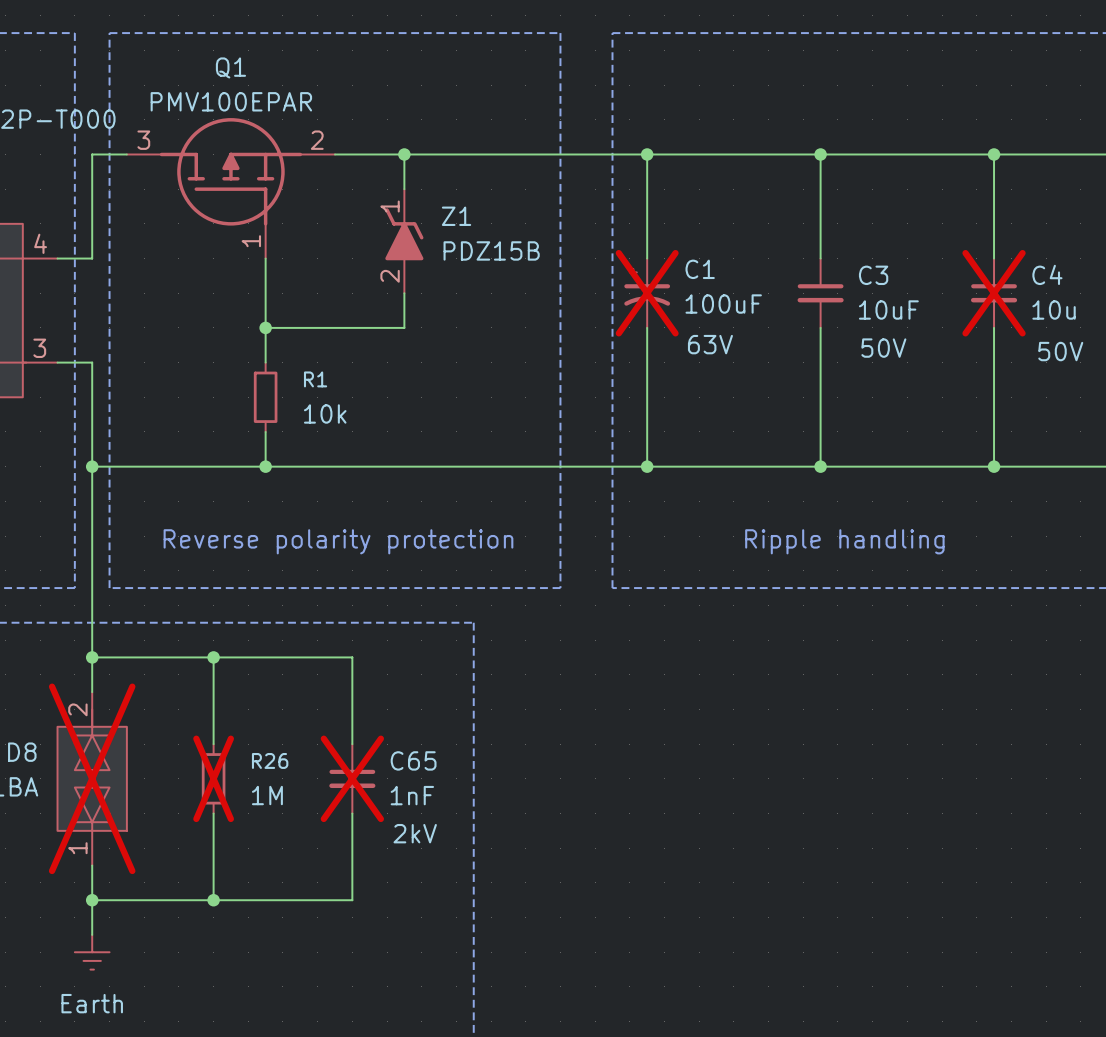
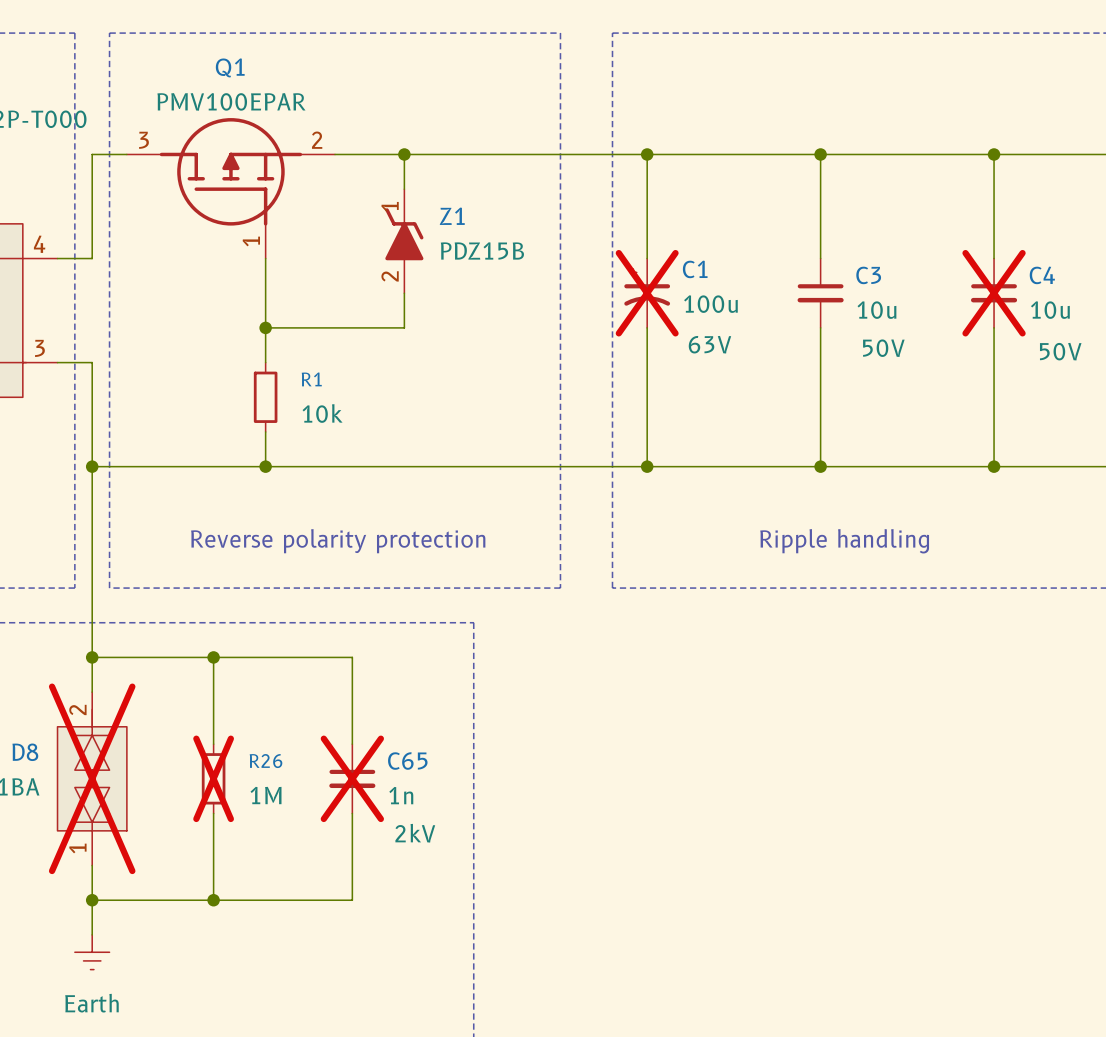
C1 value: 100uF (723, 304) -> 100u (710, 304)
C3 value: 10uF (888, 310) -> 10u (876, 310)
C65 value: 1nF (412, 795) -> 1n (401, 795)

